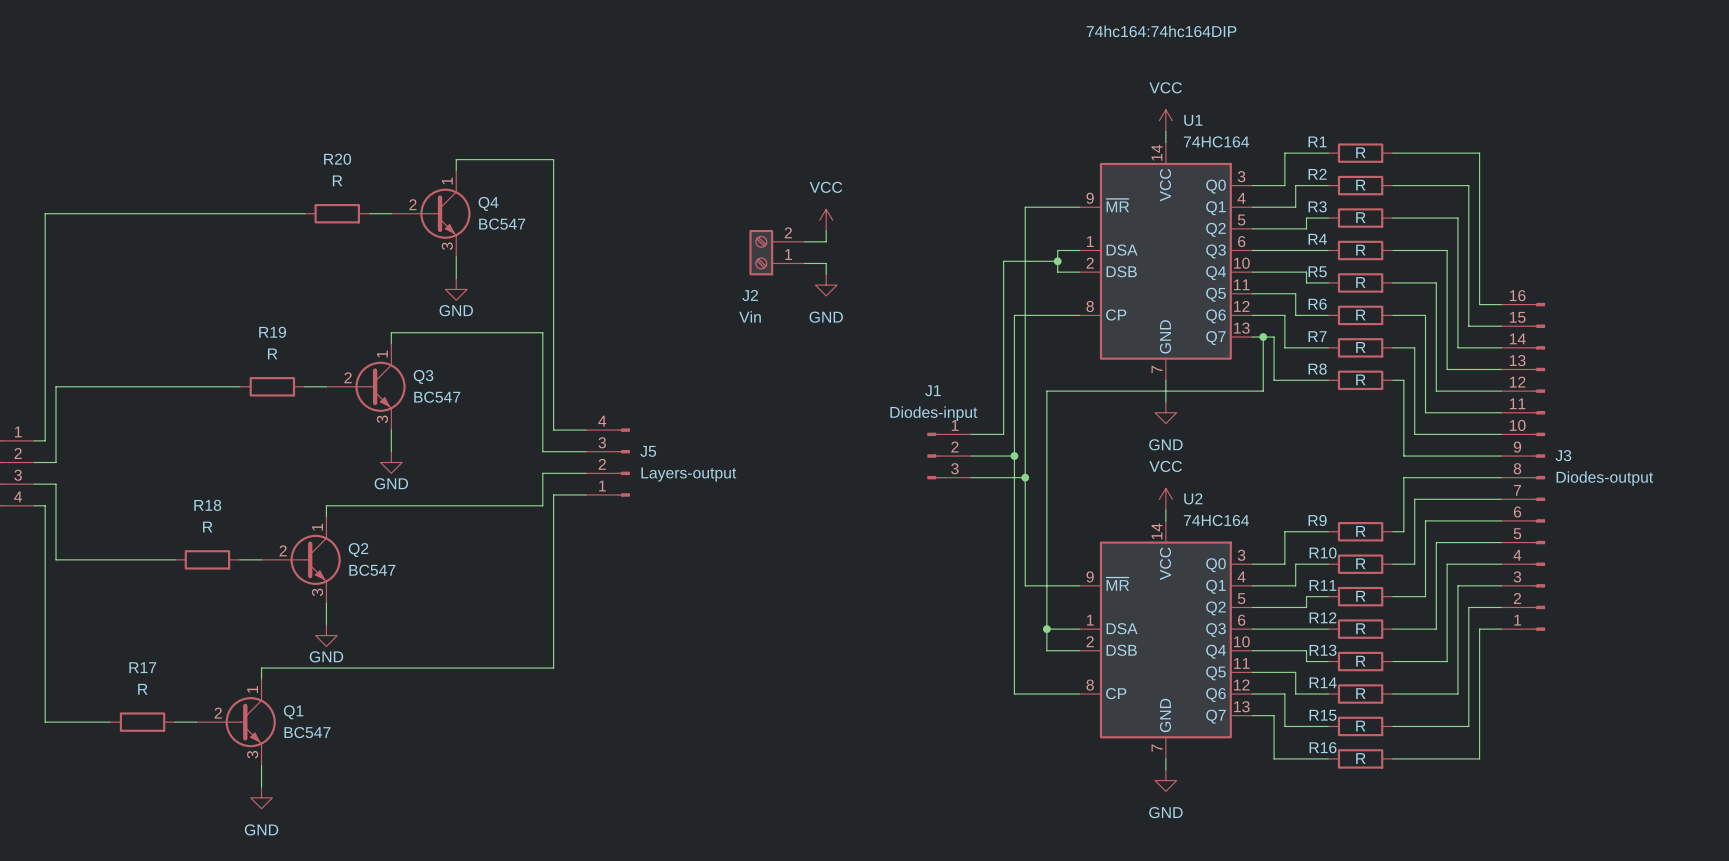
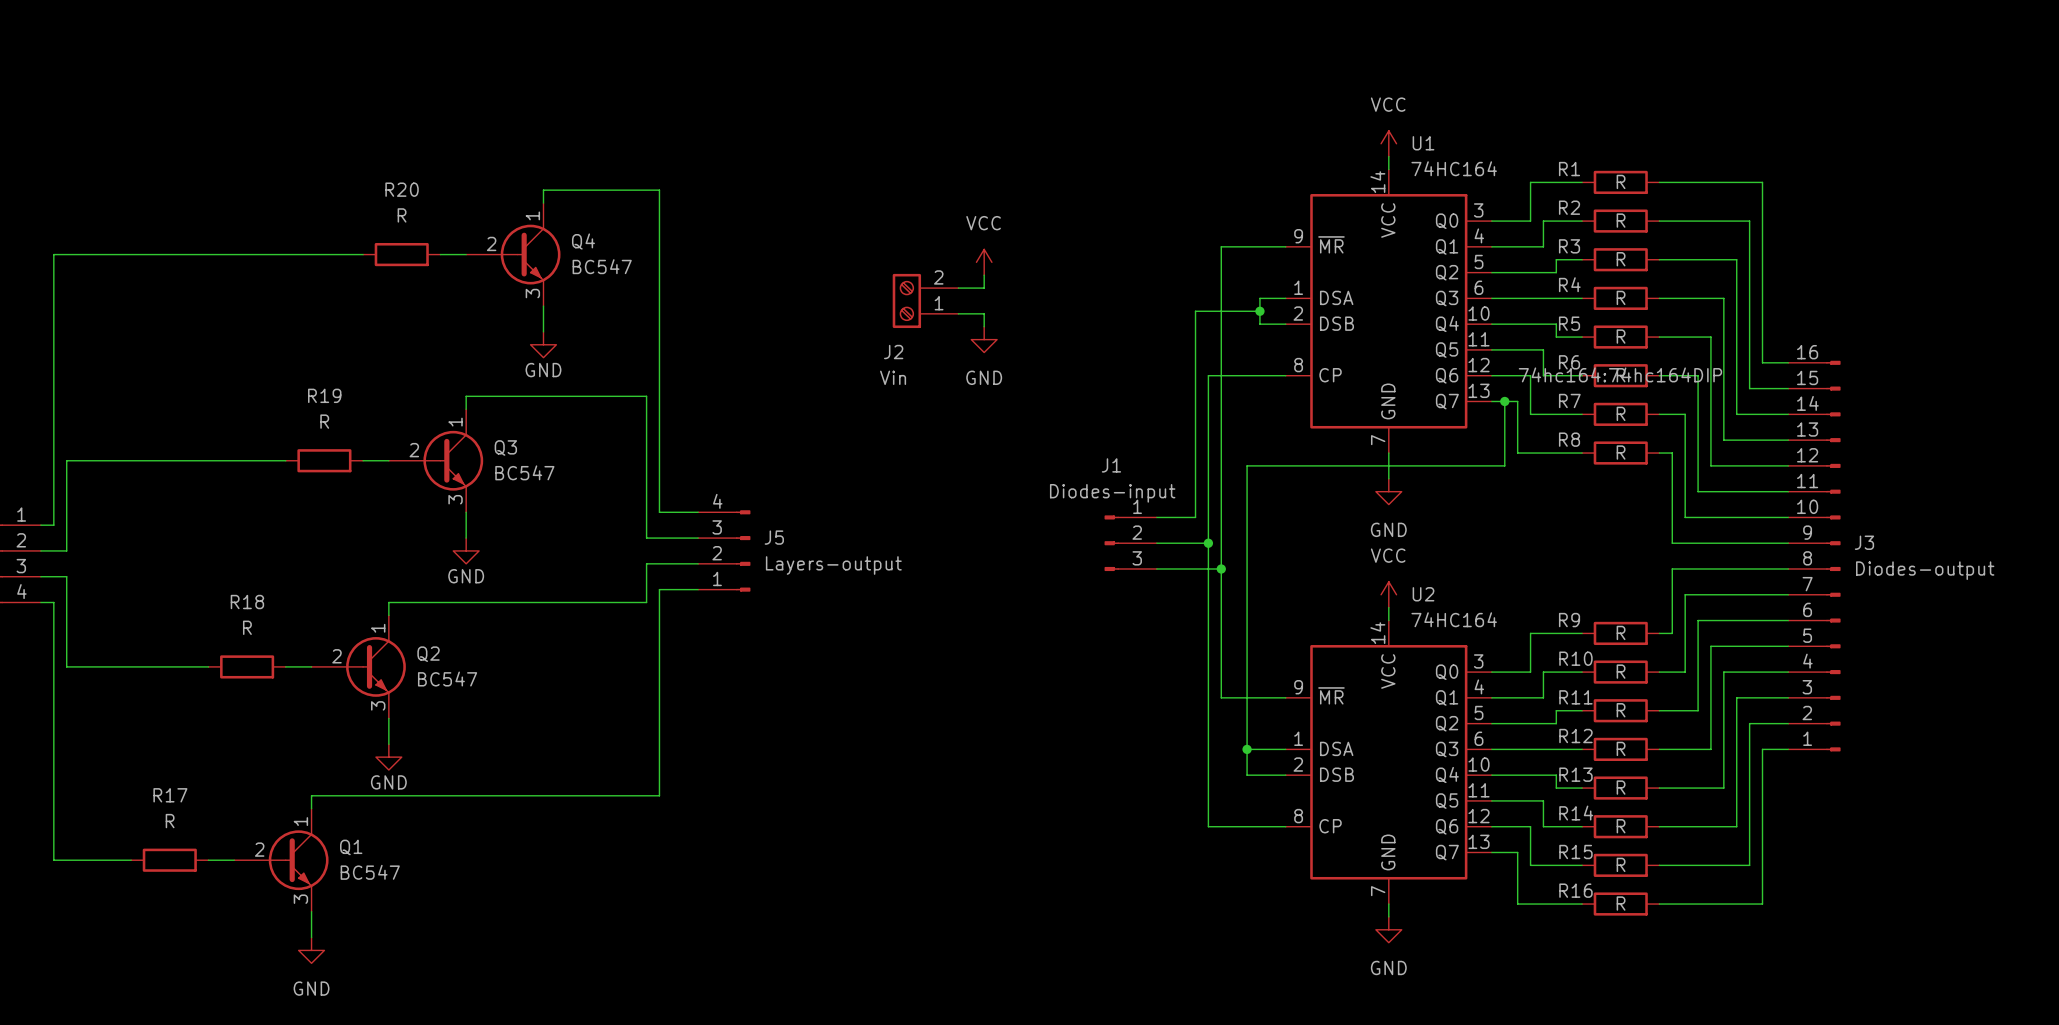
U1 text position: 74hc164:74hc164DIP (1161, 31) -> 74hc164:74hc164DIP (1620, 374)

